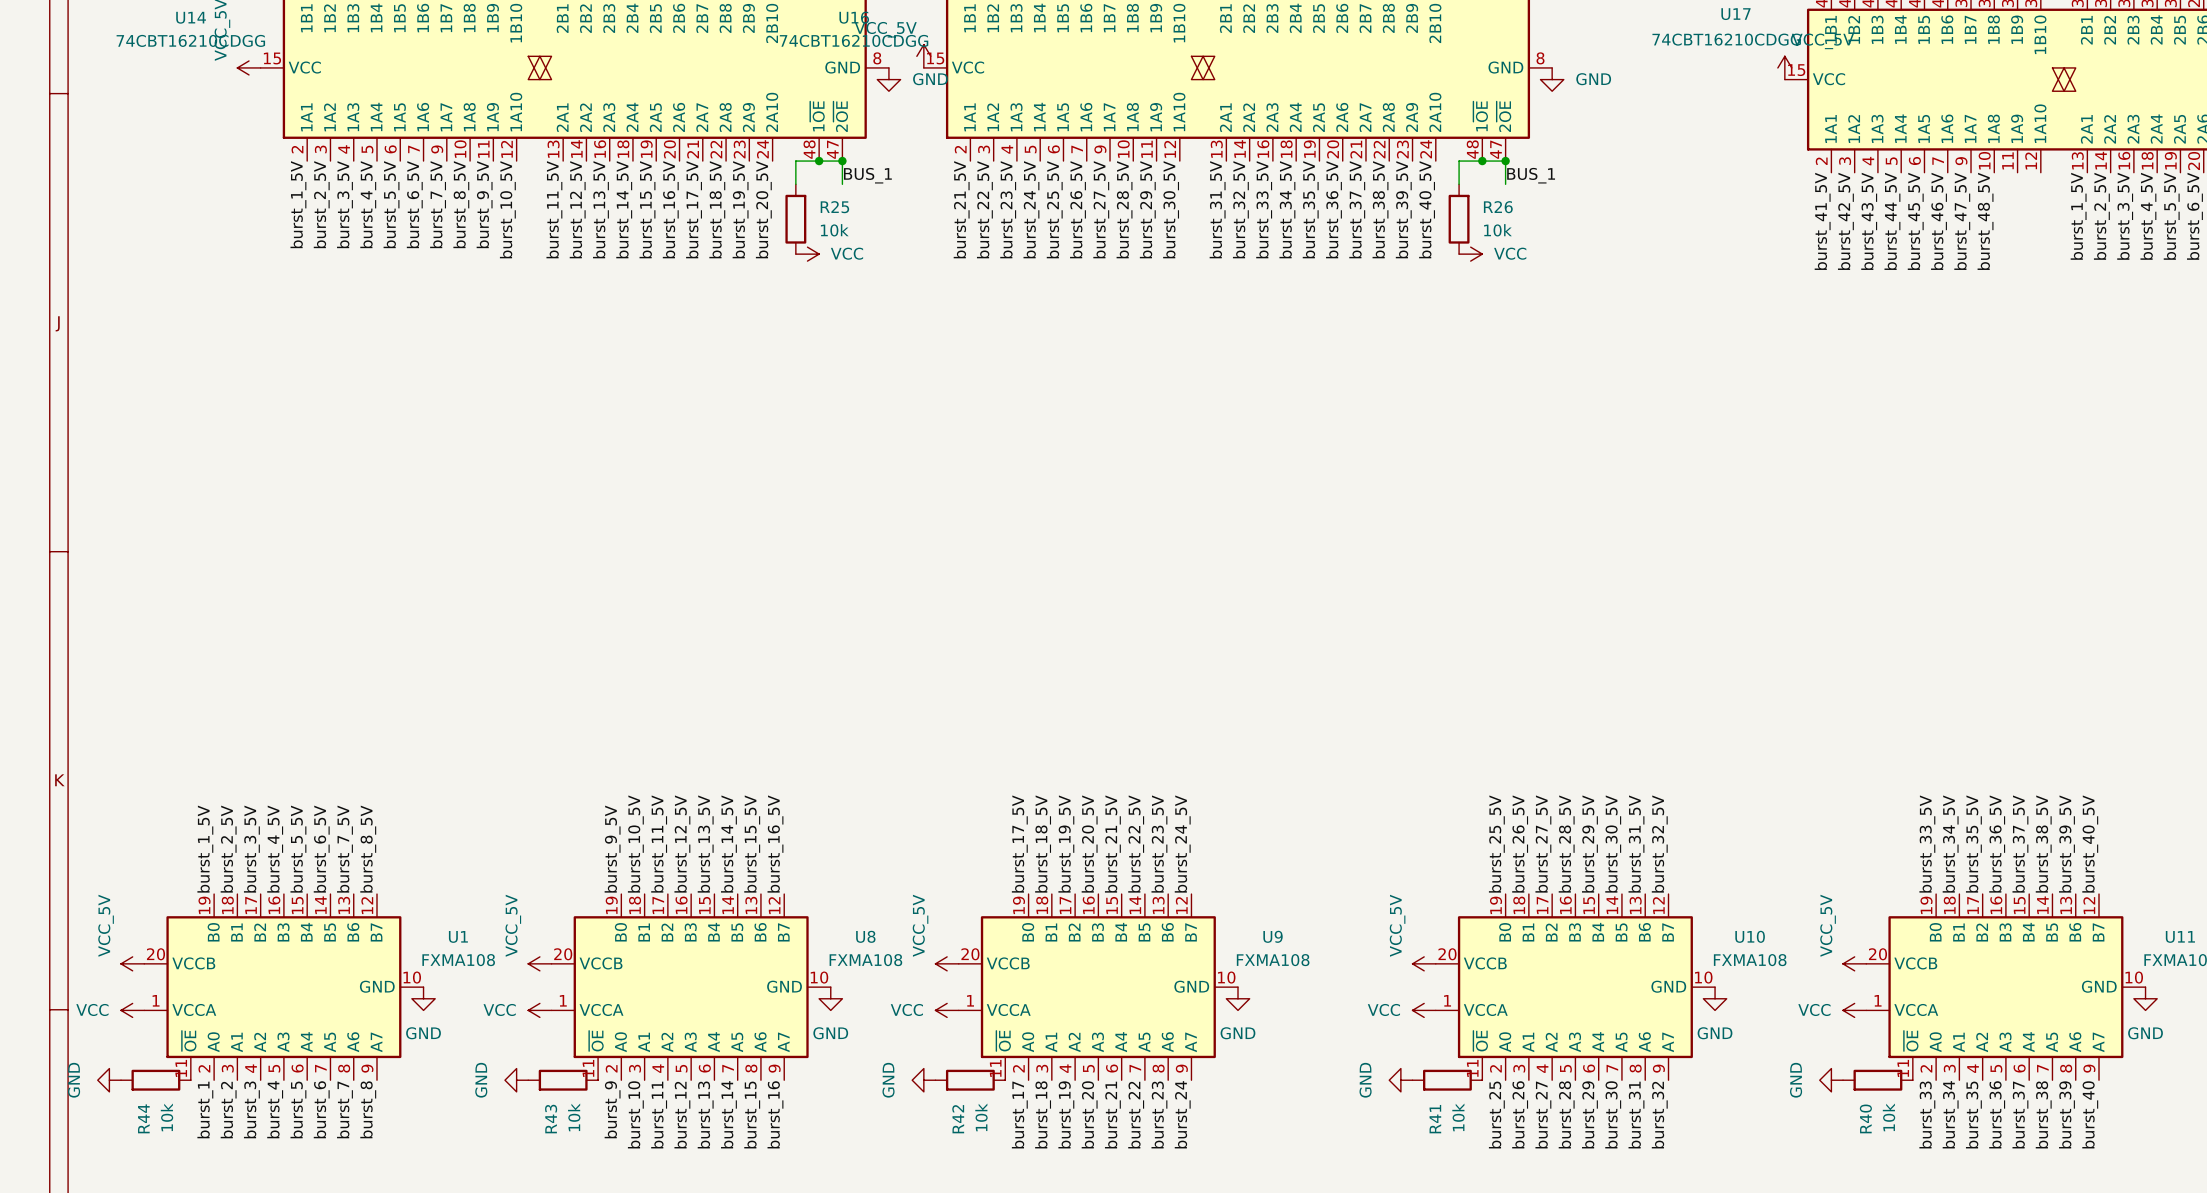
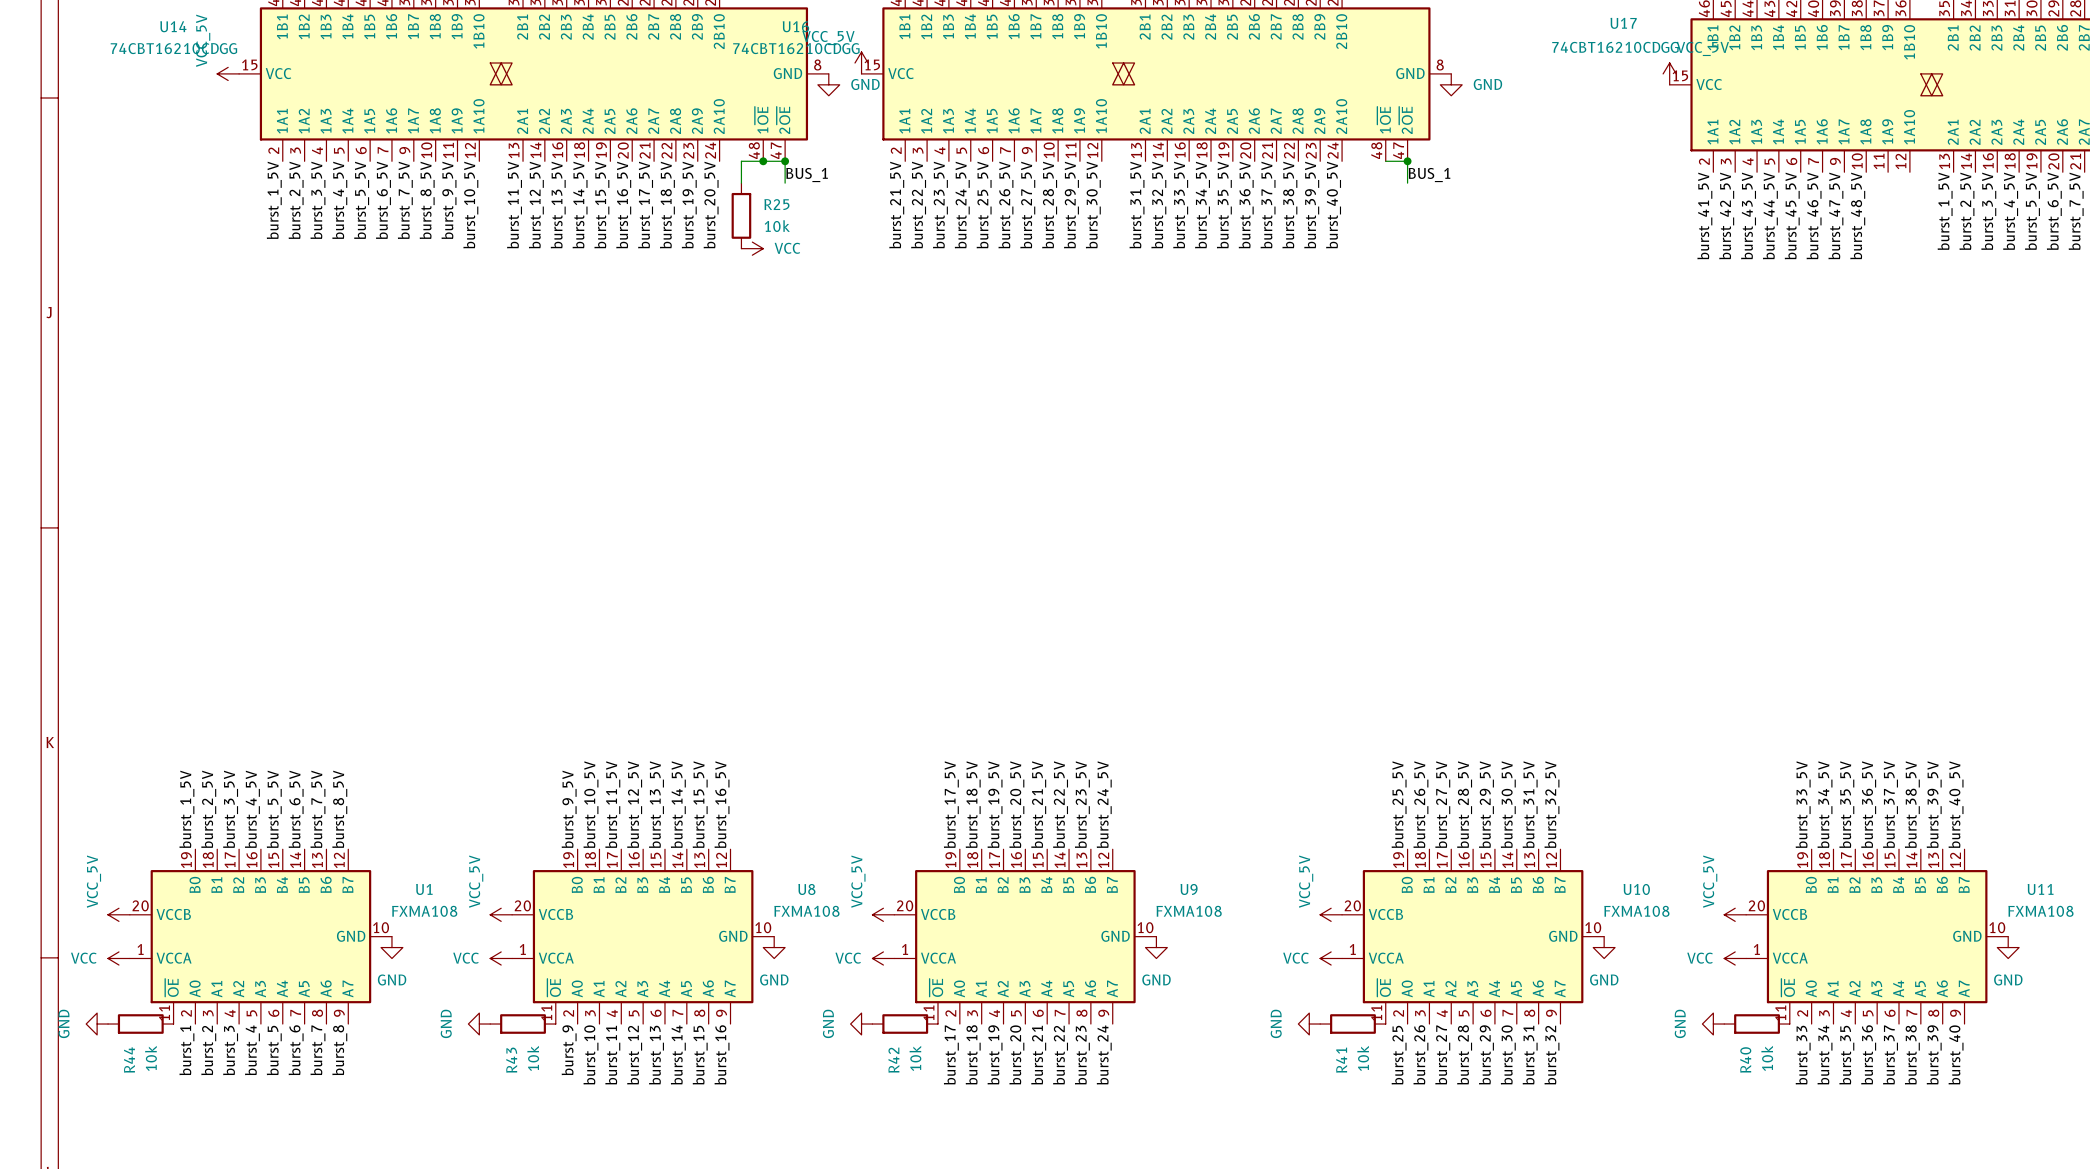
wire: (1482, 161) (1459, 161) (1459, 184) -> none
junction: (1482, 161) -> none
R26: 10k (1459, 219) -> none
power symbol: VCC (1470, 254) -> none

